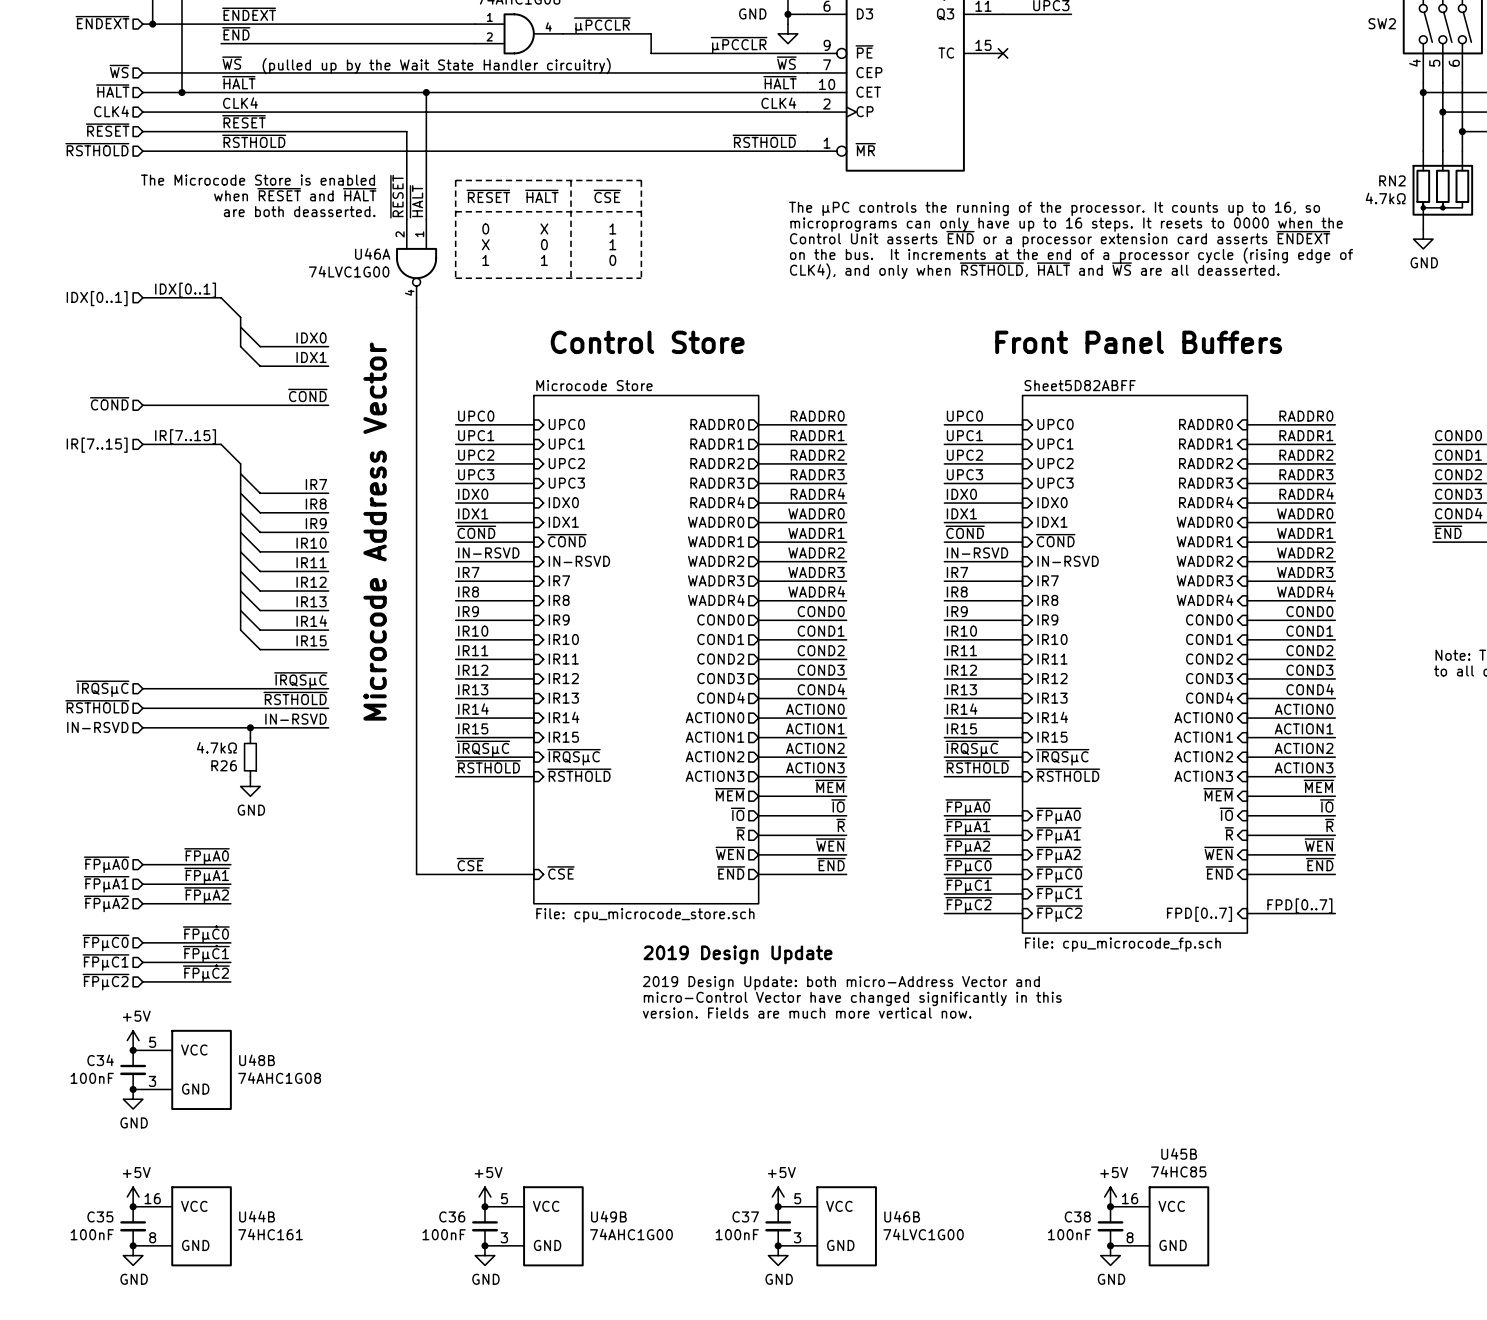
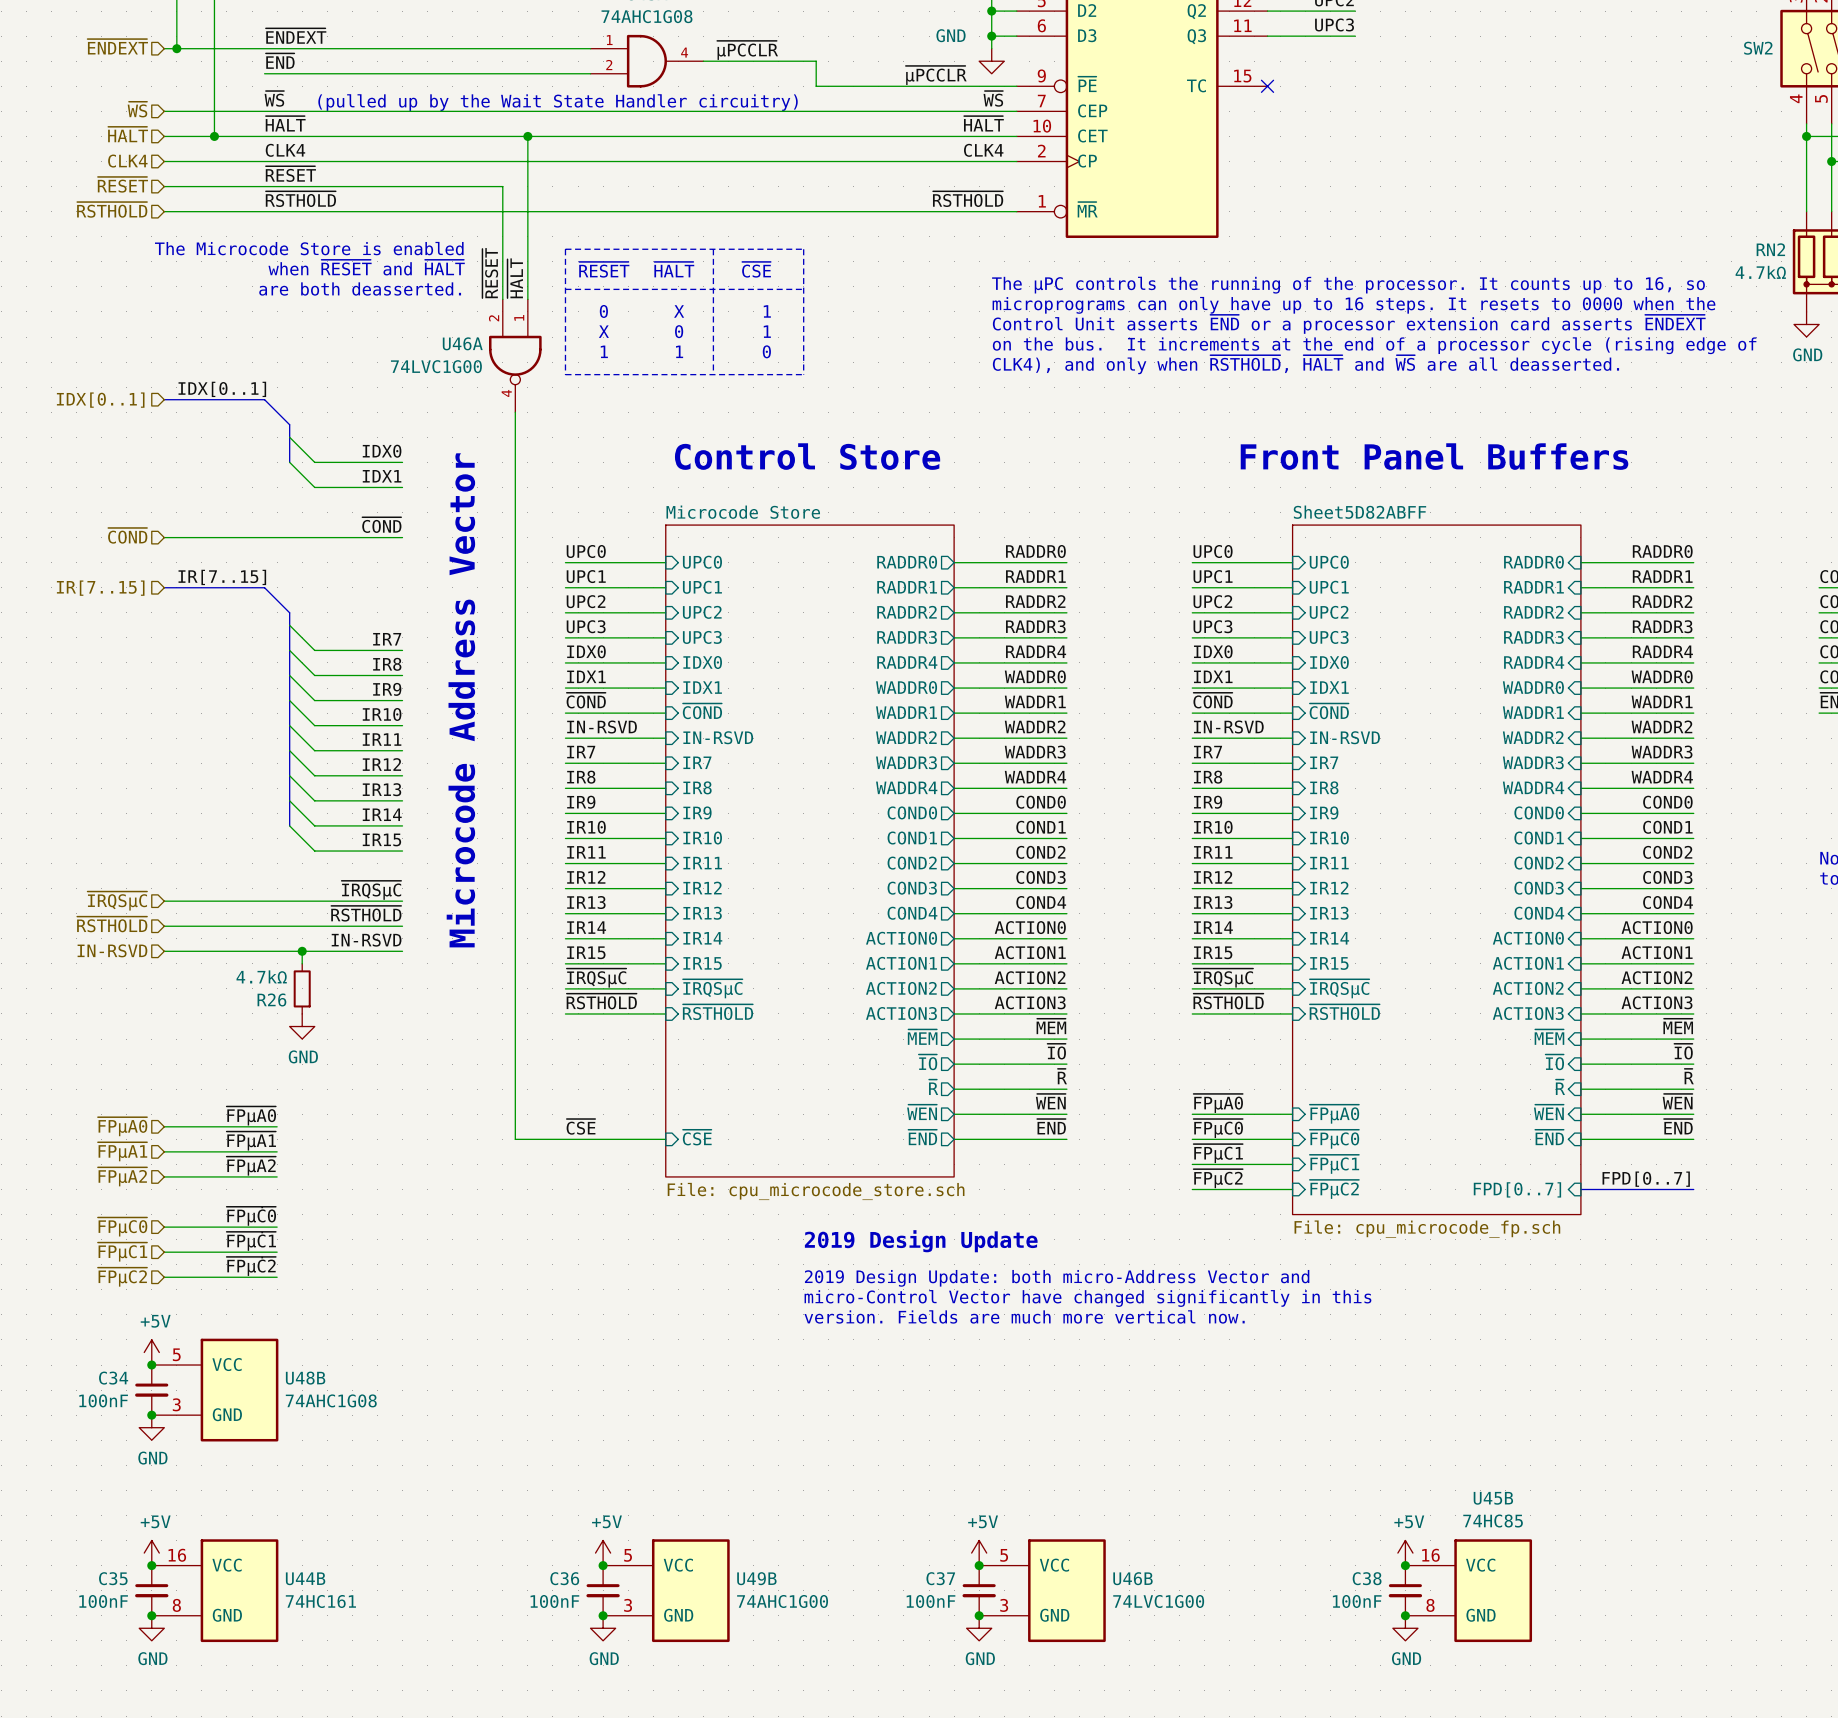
label: ~{FPµA0} (968, 807) -> none
wire: (944, 815) (1022, 815) -> none
sheet pin: ~{FPµA0} (1058, 815) -> none
label: ~{FPµA1} (968, 827) -> none
wire: (944, 835) (1022, 835) -> none
sheet pin: ~{FPµA1} (1058, 835) -> none
label: ~{FPµA2} (968, 846) -> ~{FPµA0} (1218, 1103)
sheet pin: ~{FPµA2} (1058, 855) -> ~{FPµA0} (1334, 1114)

